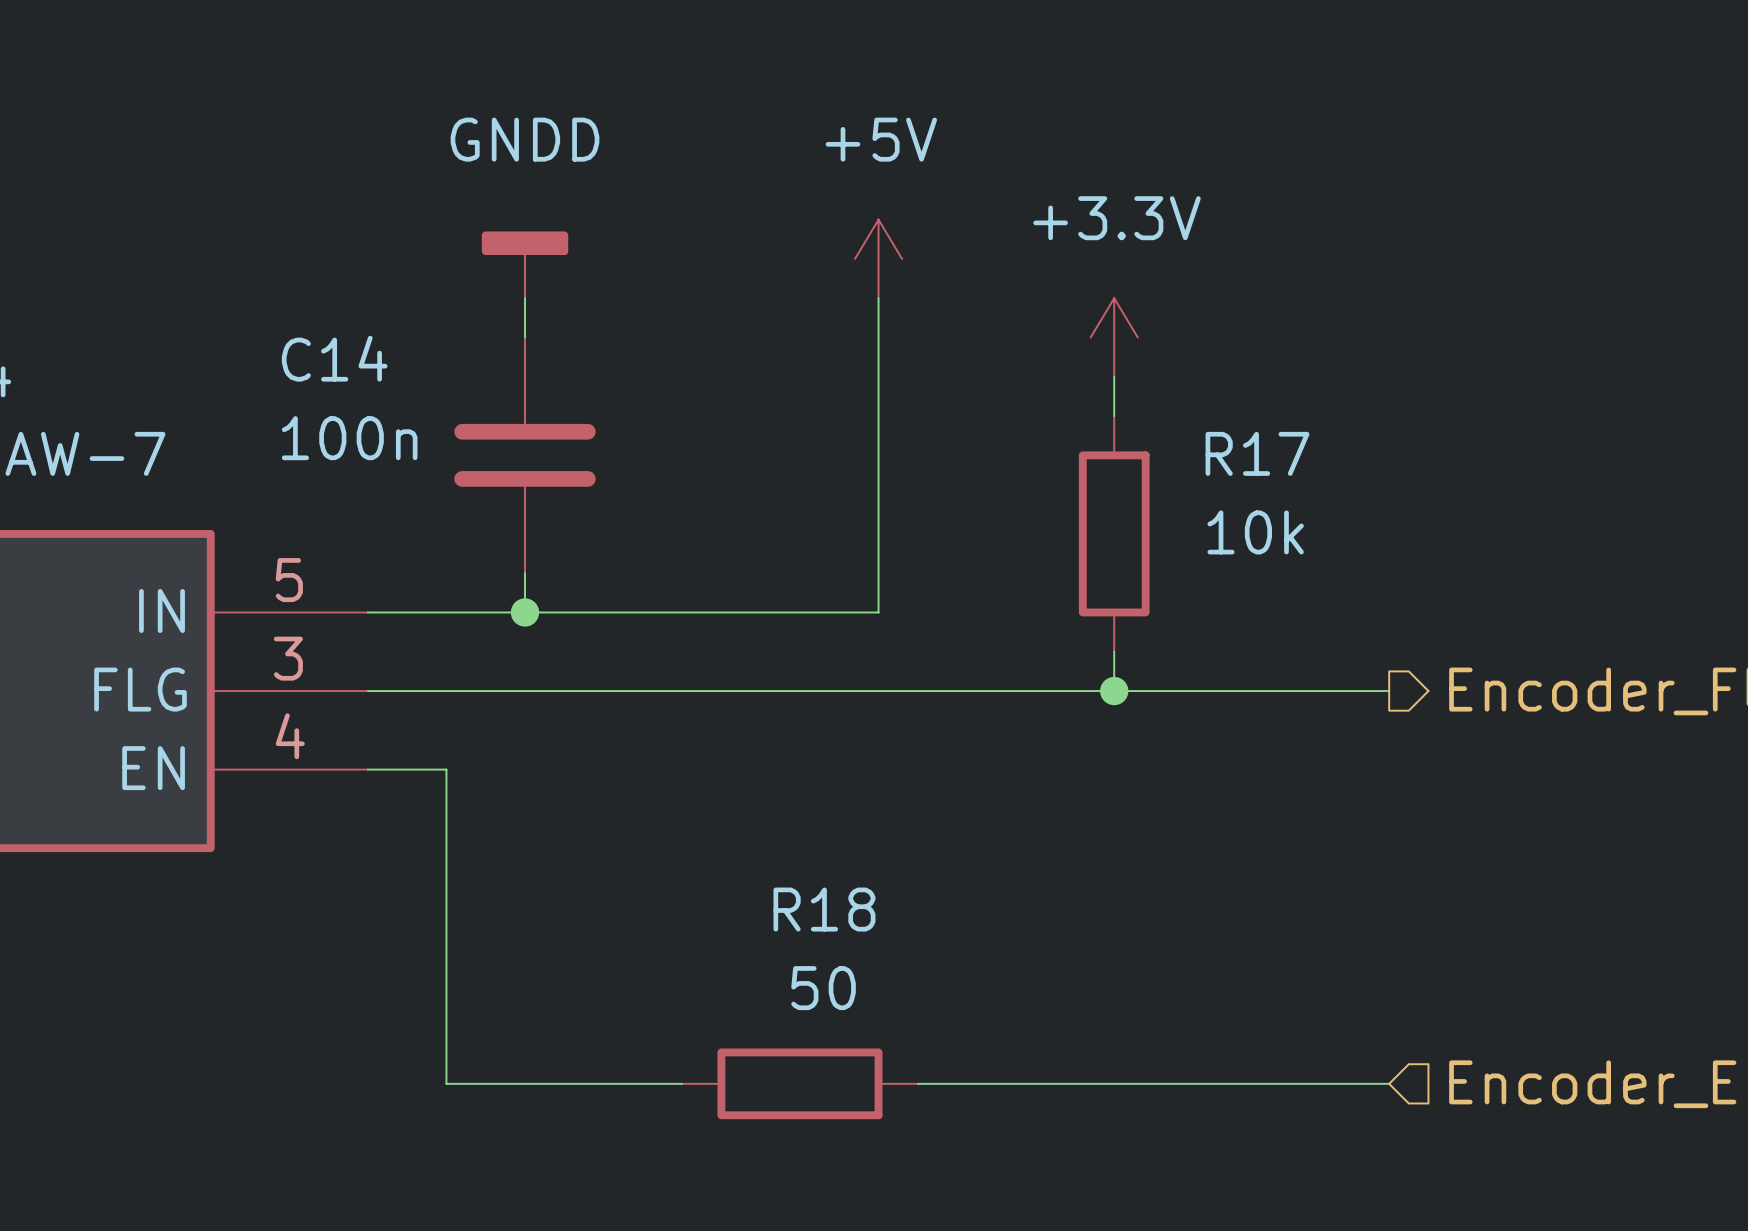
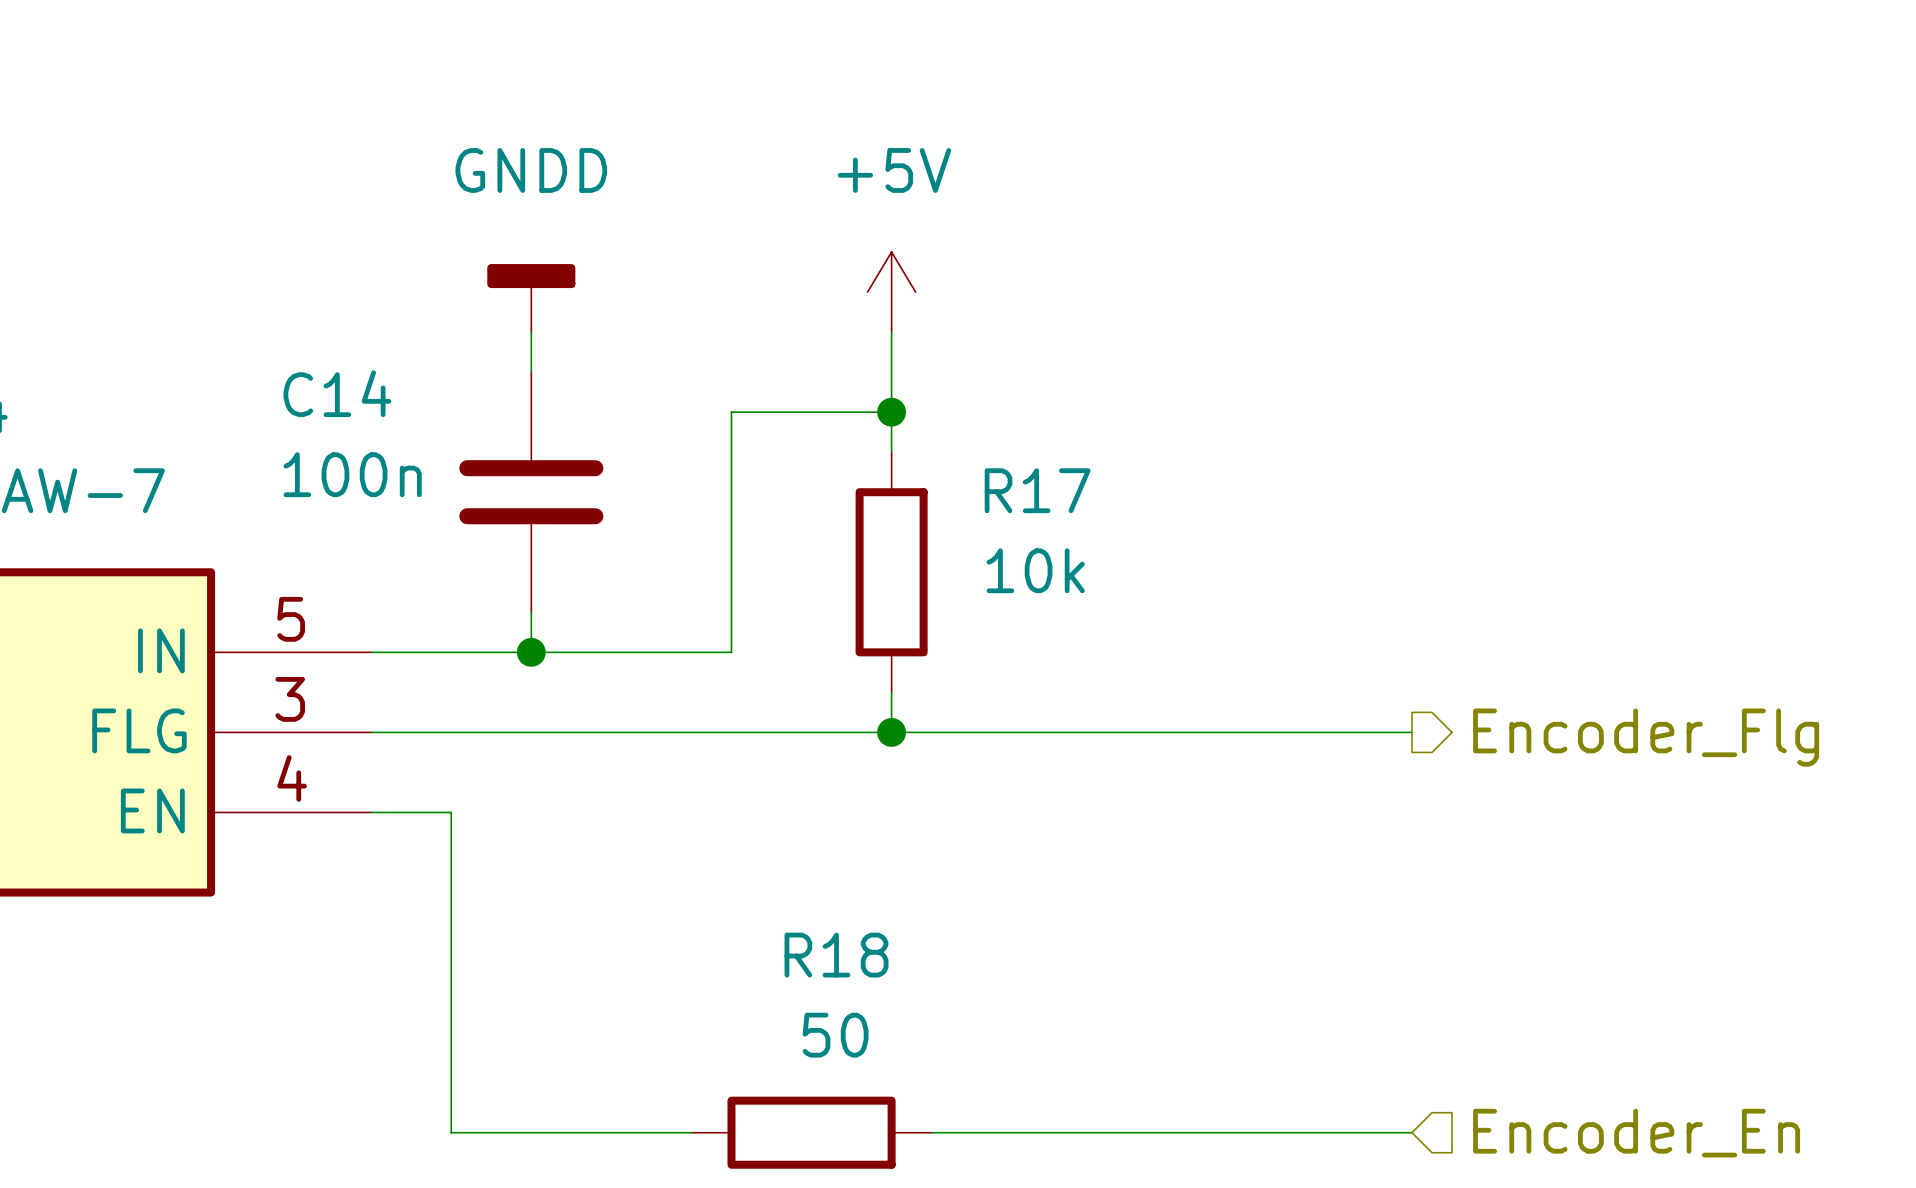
power symbol: +3.3V (1114, 337) -> none
junction: none -> (891, 412)
wire: (1114, 376) (1114, 416) -> none
wire: (878, 416) (878, 612) (721, 612) -> (891, 412) (731, 412) (731, 652)
R17 position: (1114, 533) -> (891, 572)
wire: (1114, 651) (1114, 691) -> (891, 692) (891, 732)
junction: none -> (891, 732)
junction: (1114, 691) -> none

